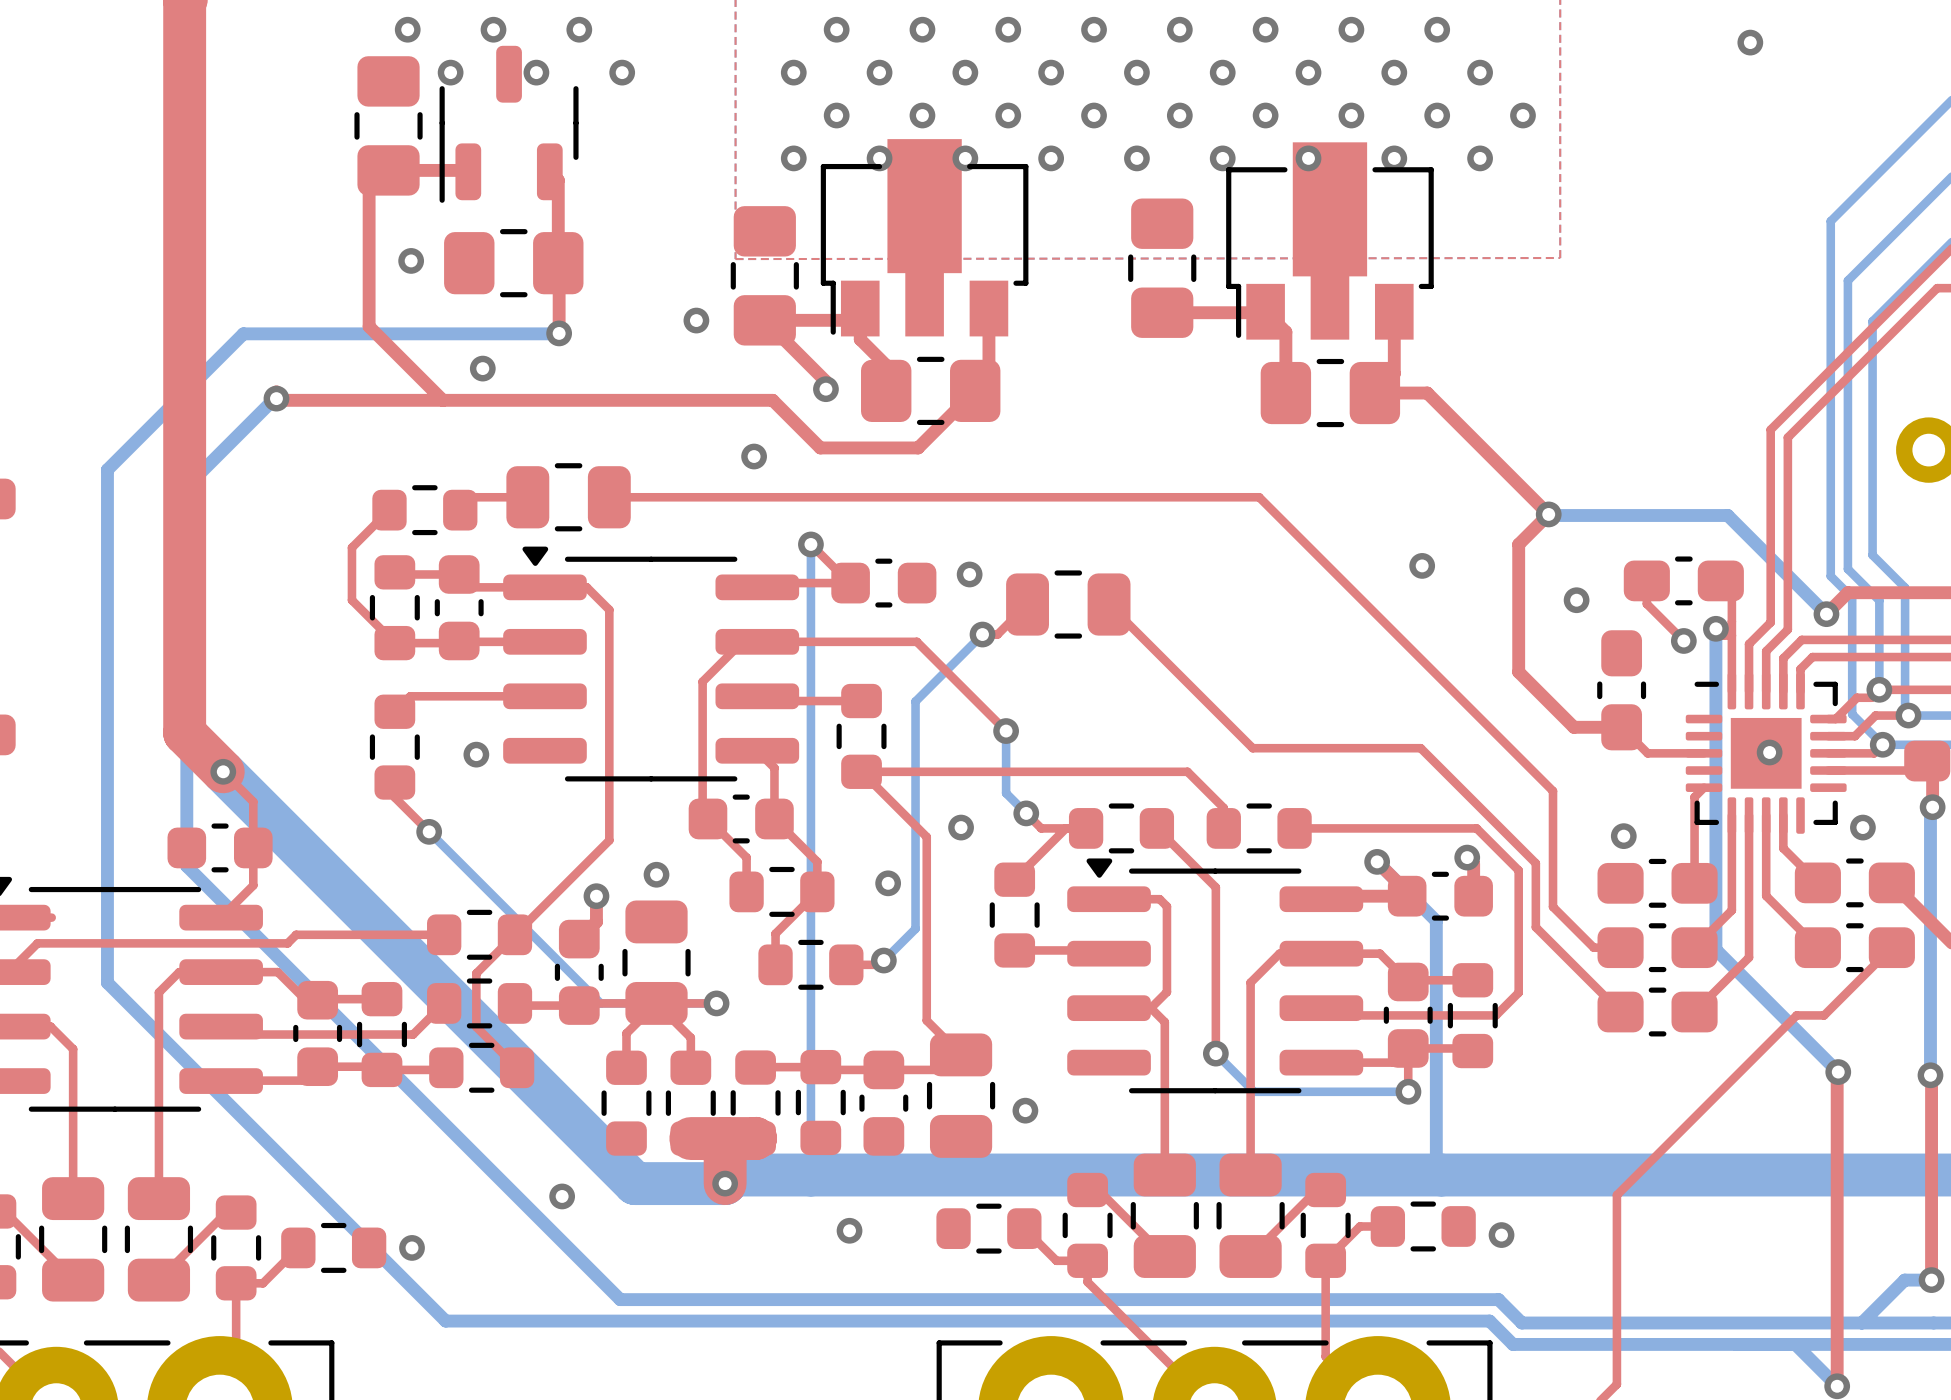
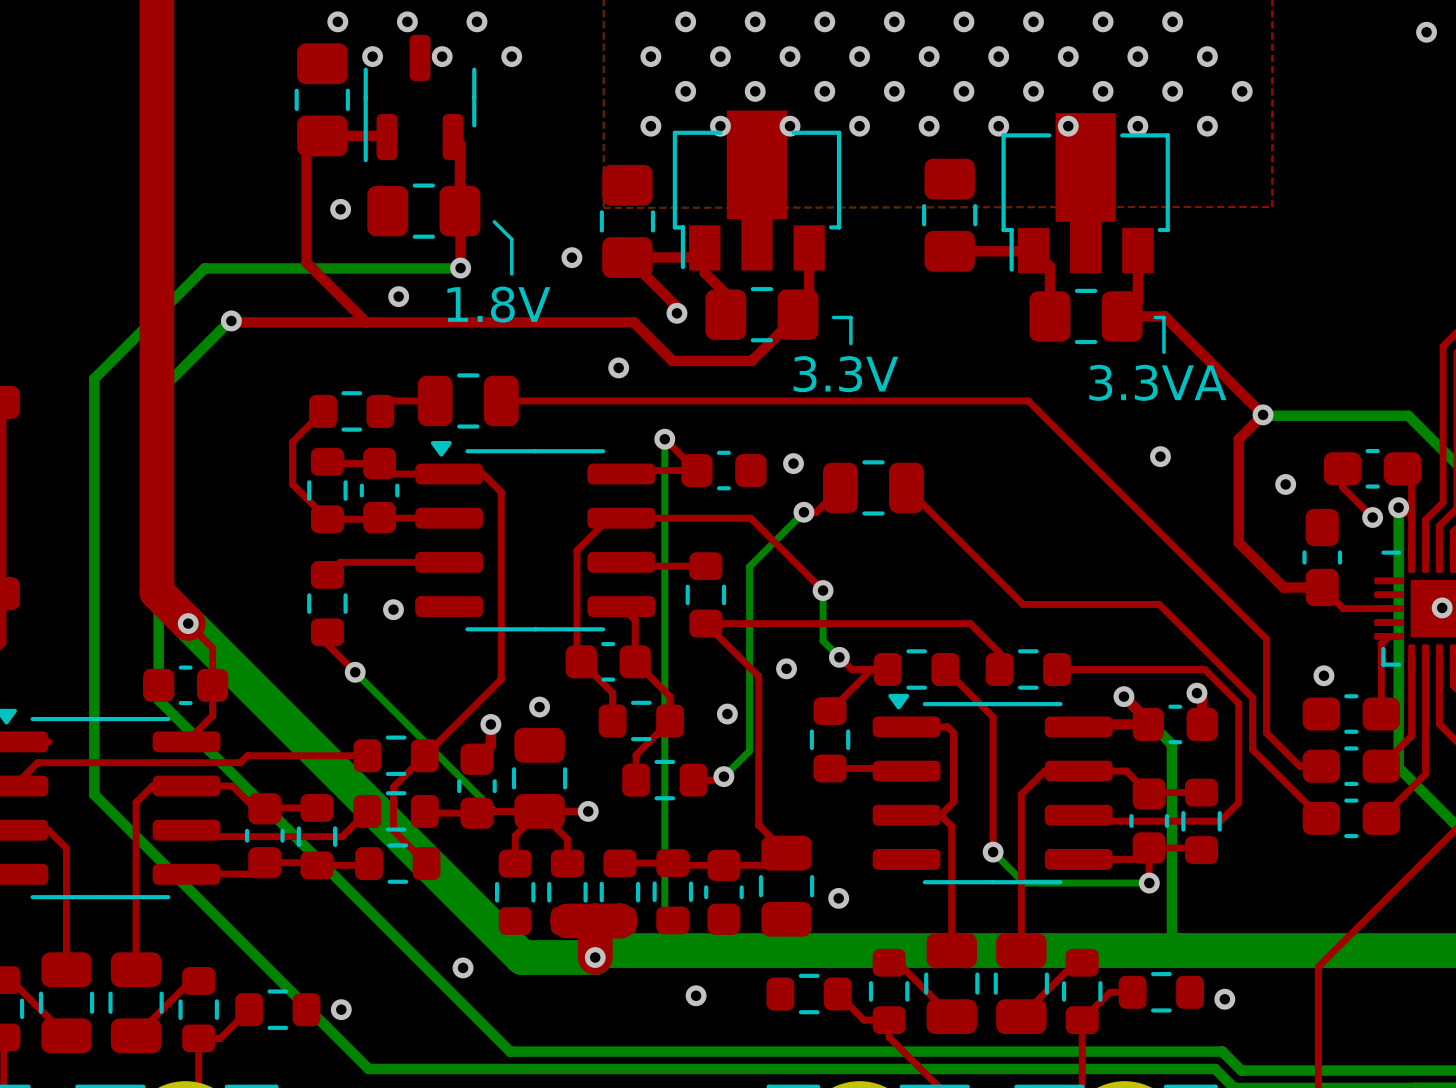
line: none -> (494, 221) (511, 239) (511, 274)
text: none -> 1.8V (498, 304)
line: none -> (833, 317) (850, 317) (850, 343)
line: none -> (1155, 317) (1163, 317) (1163, 352)
text: none -> 3.3V (845, 374)
text: none -> 3.3VA (1157, 382)

